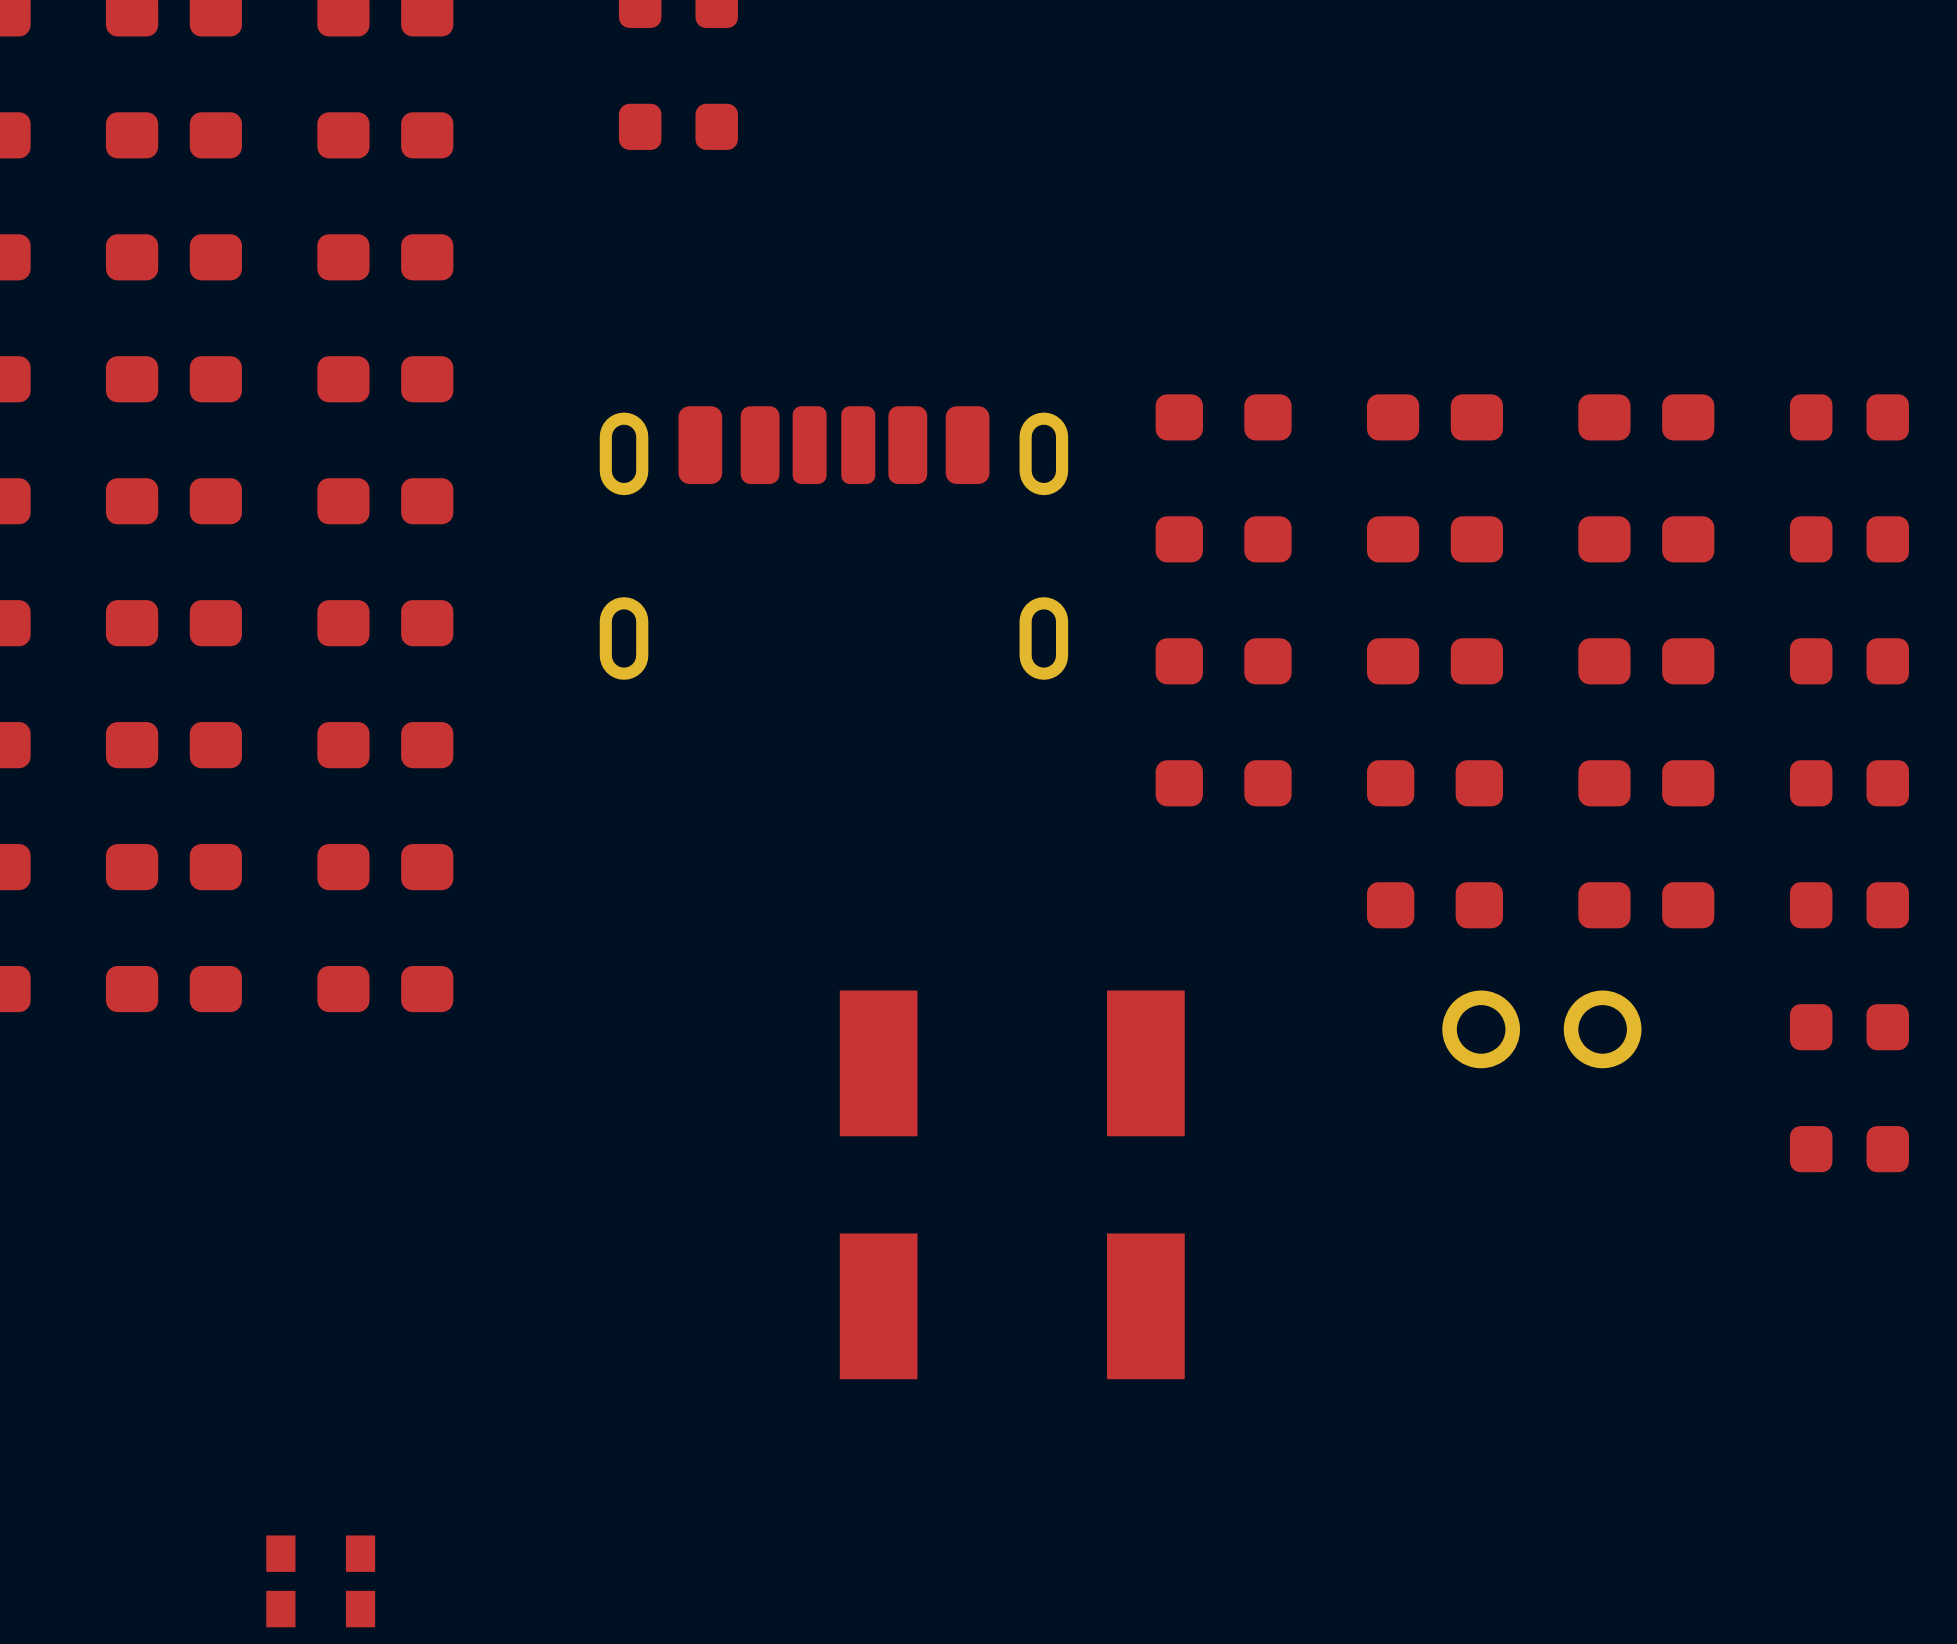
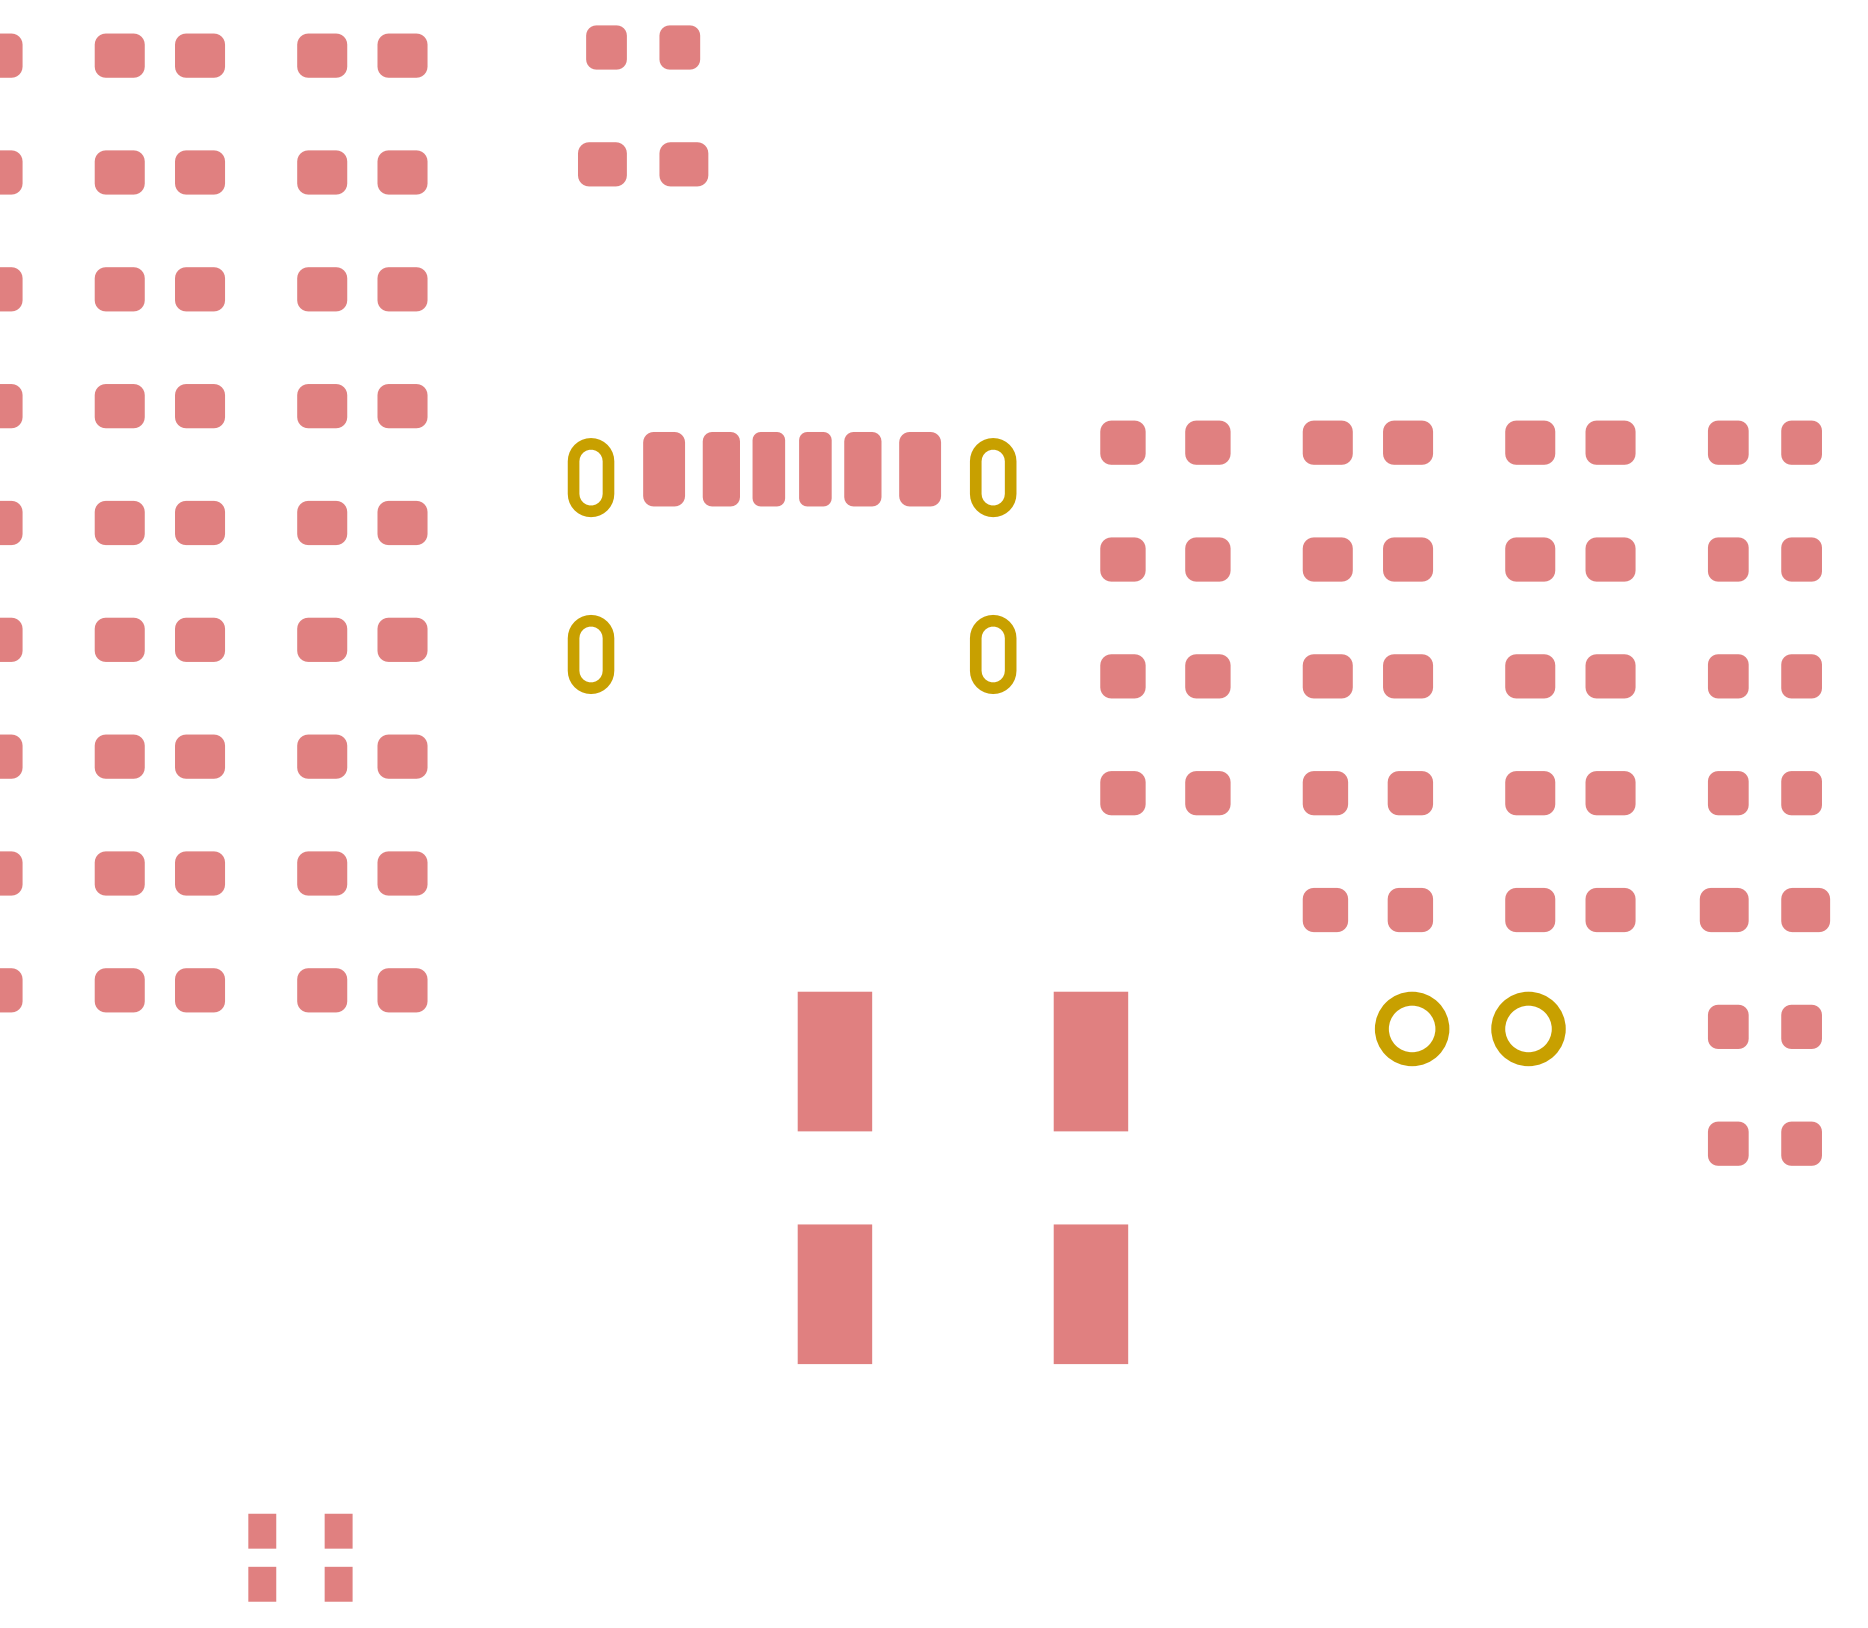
part footprint: [618, 103, 738, 150] -> [577, 142, 709, 187]
part footprint: [1789, 882, 1909, 929] -> [1699, 887, 1831, 933]

